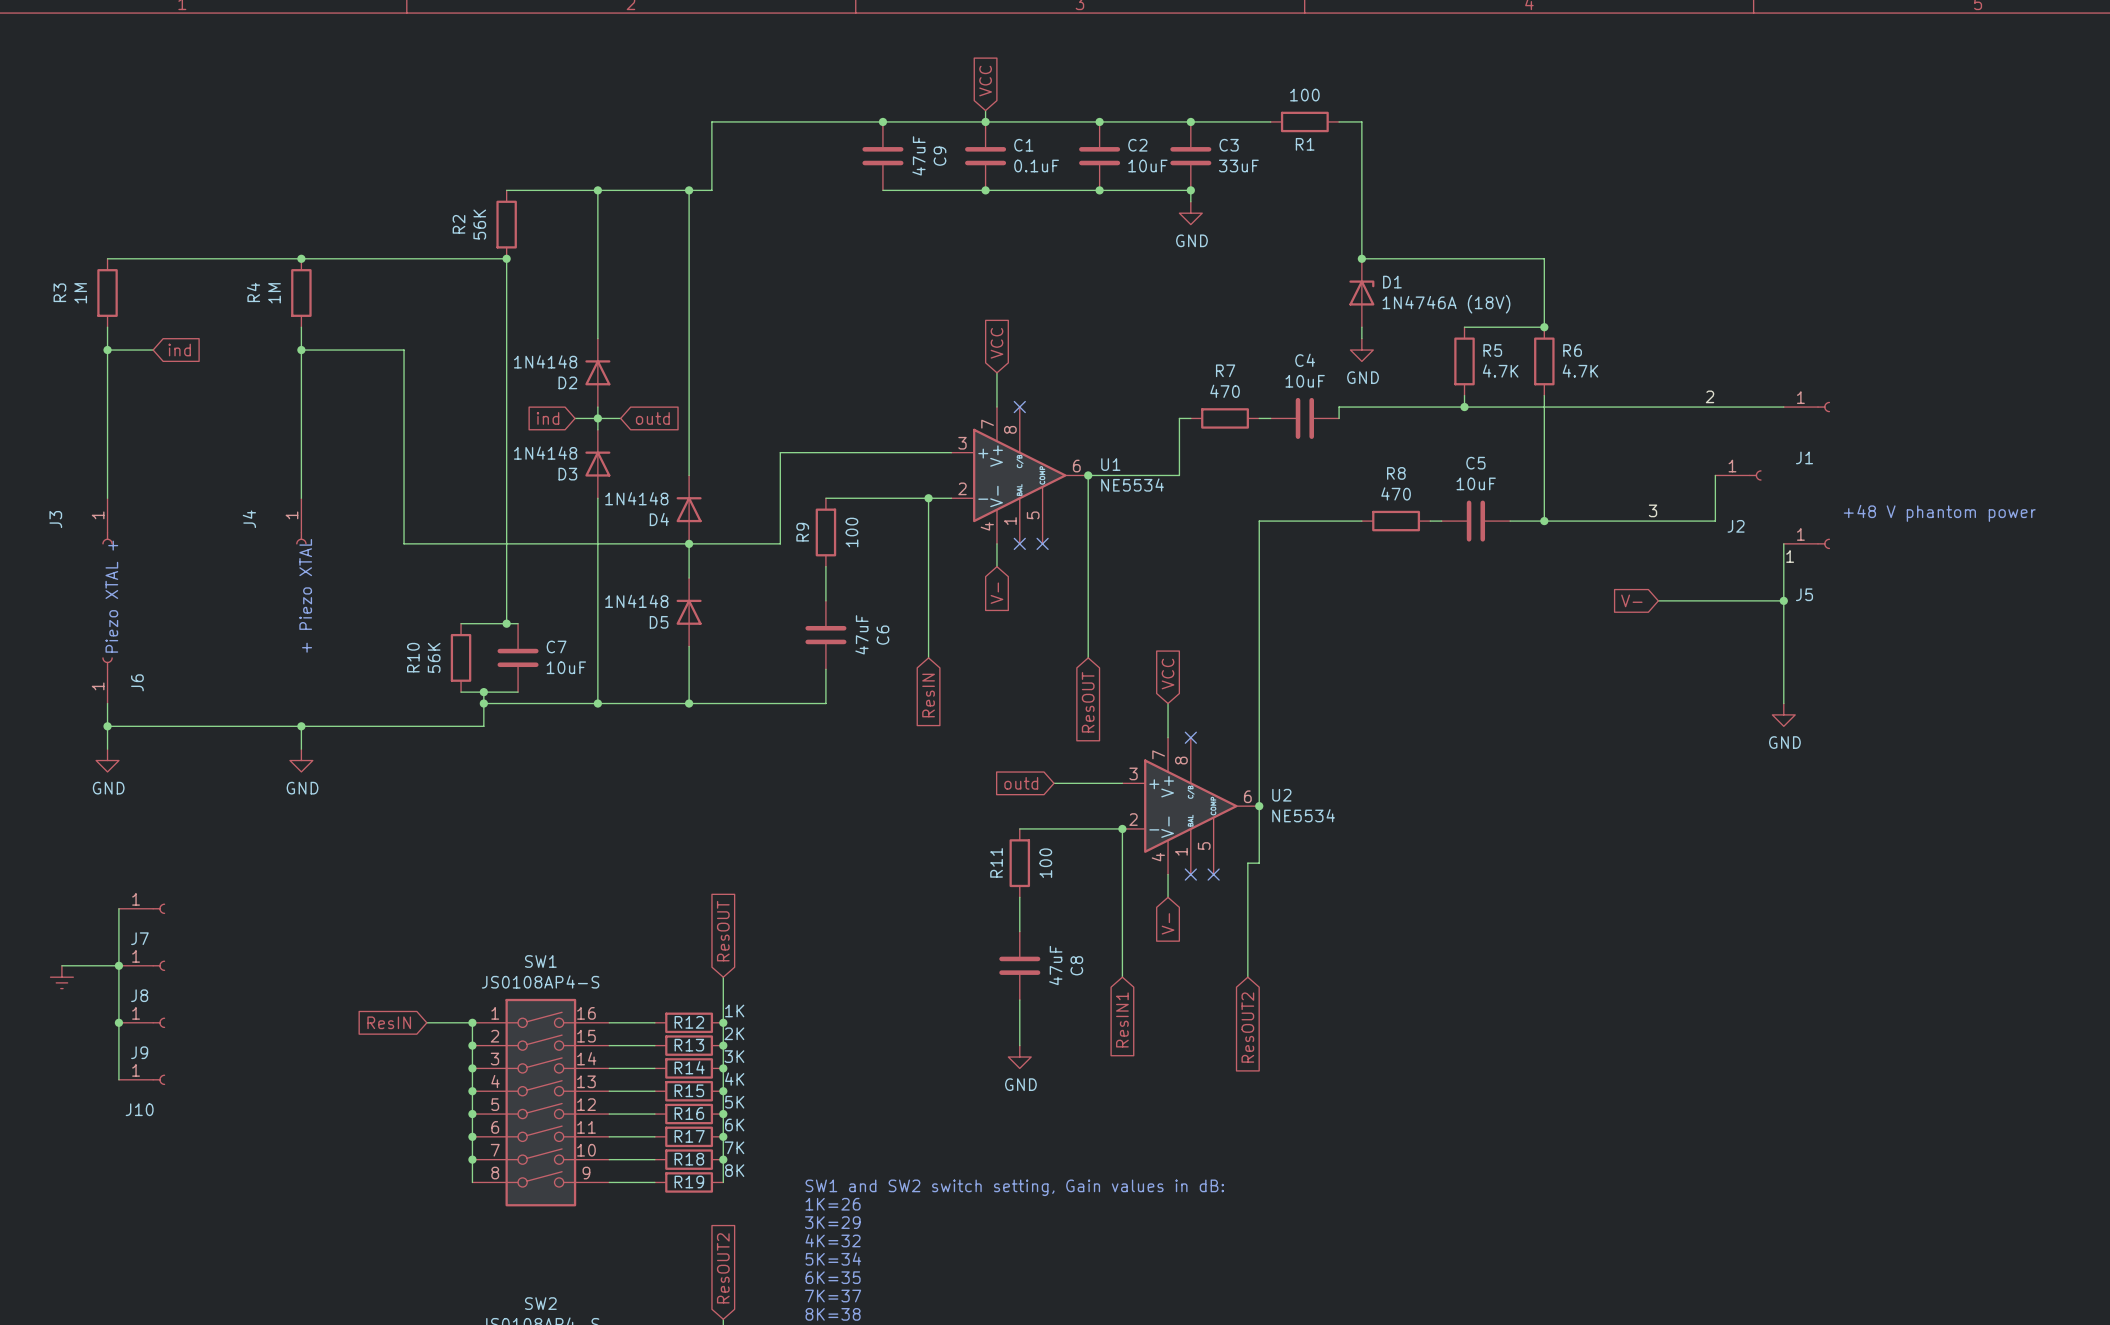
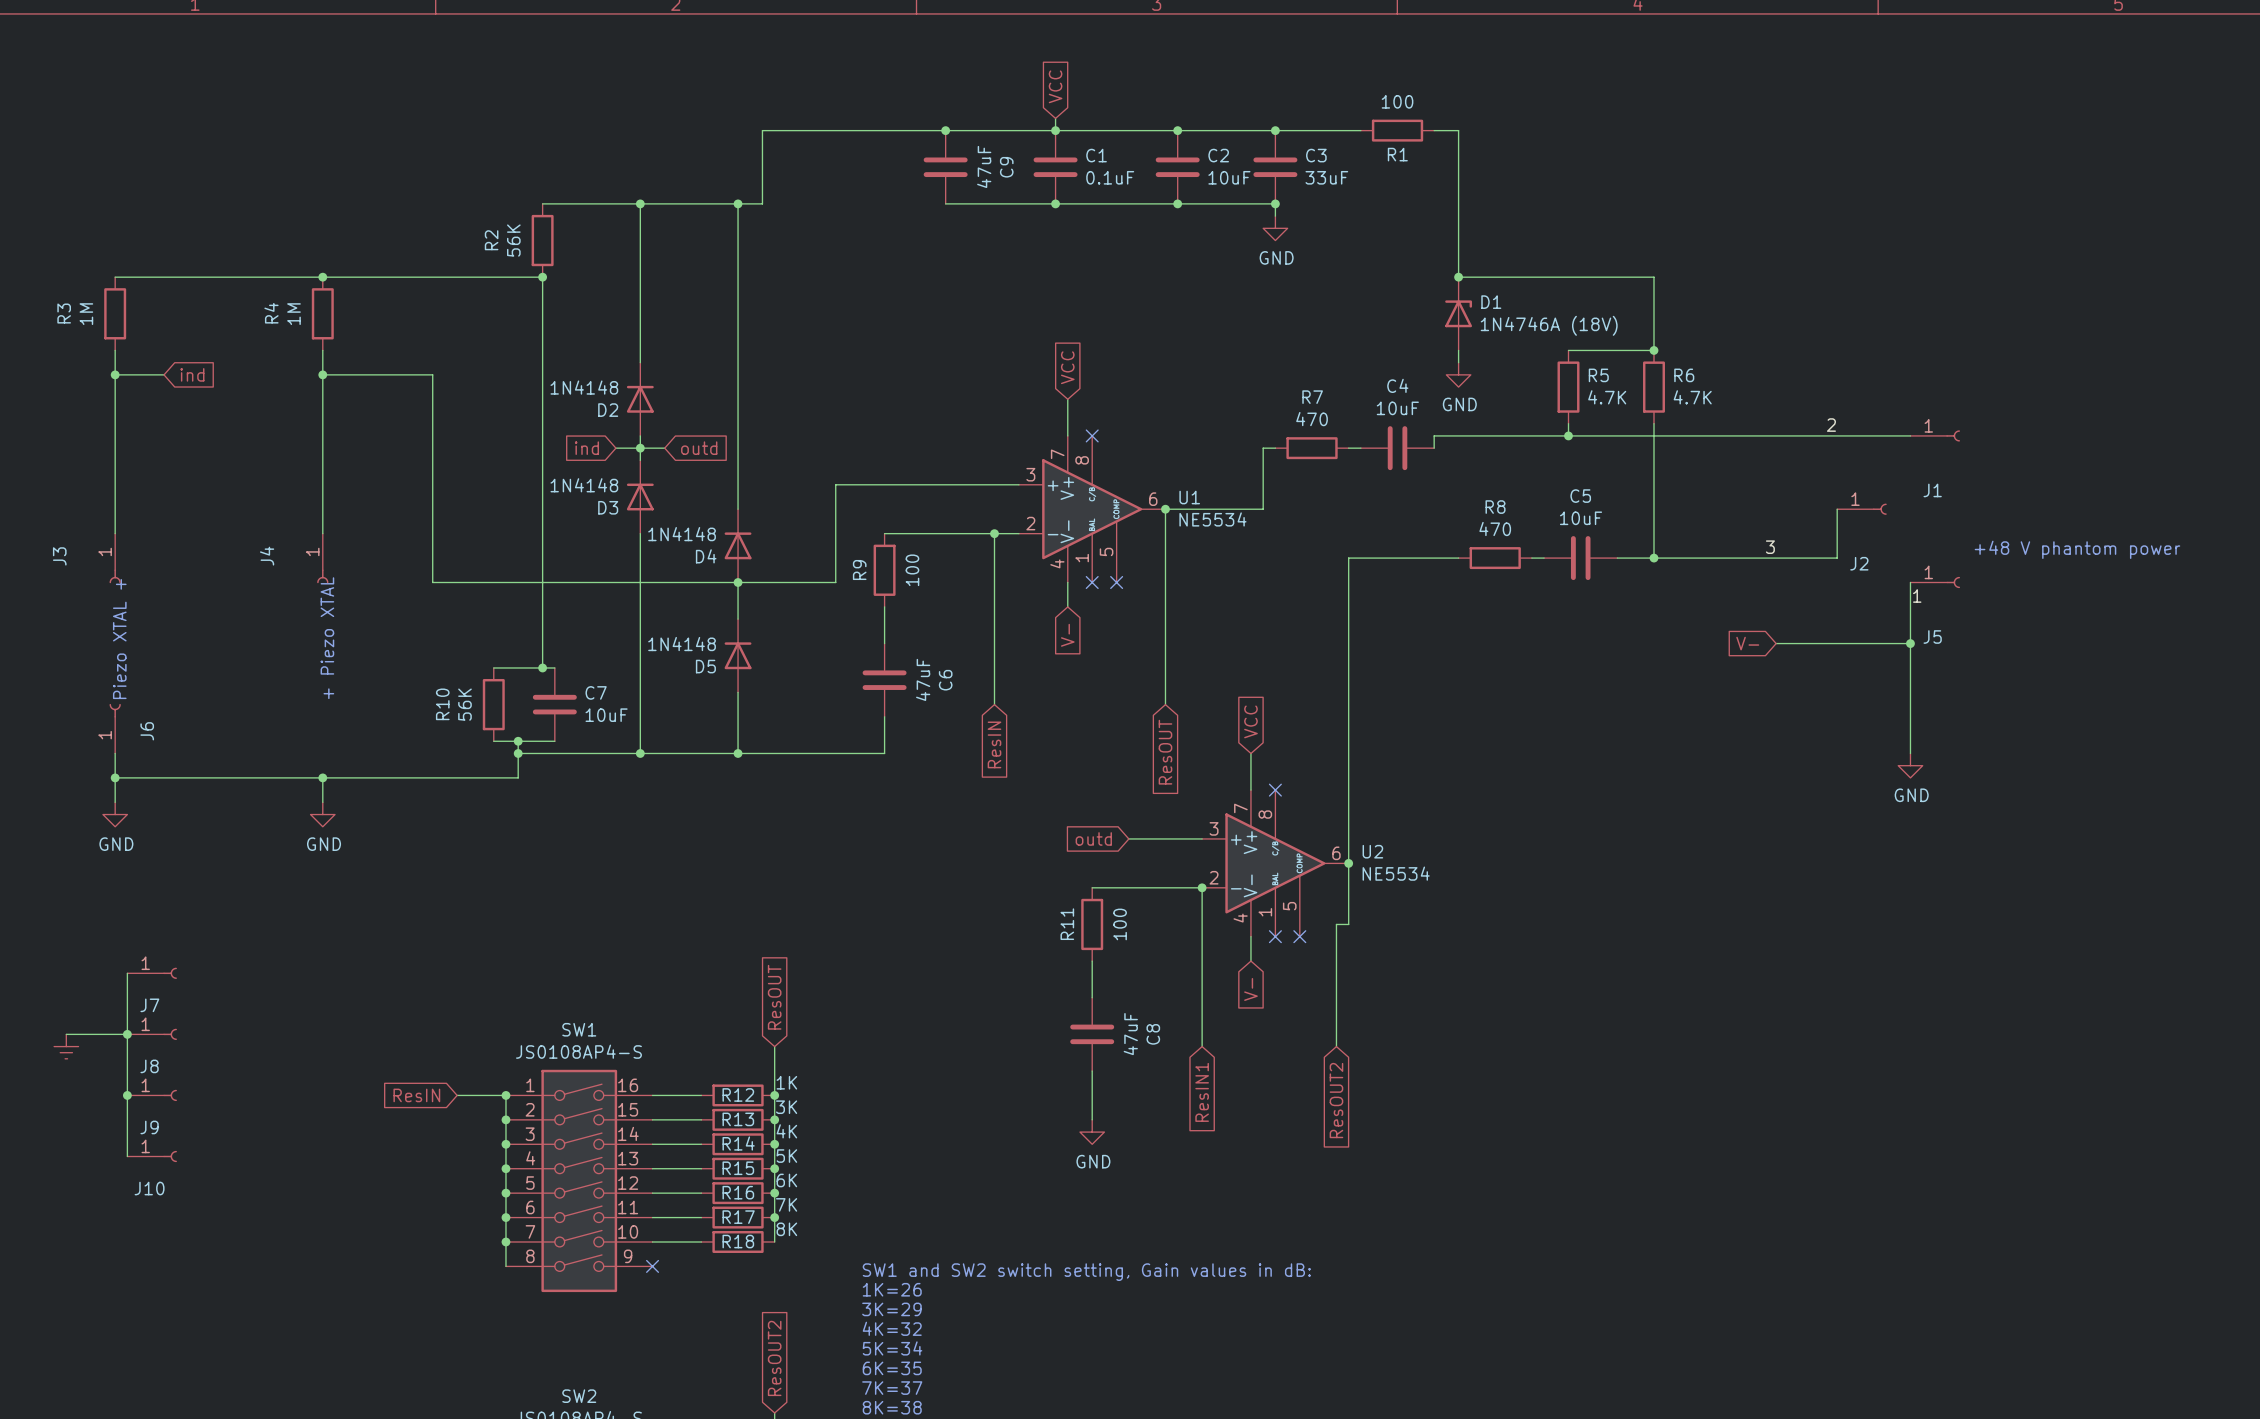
R13 value: 2K (734, 1033) -> 3K (786, 1107)
R14 value: 3K (734, 1056) -> 4K (786, 1131)
R15 value: 4K (734, 1079) -> 5K (786, 1156)
R16 value: 5K (734, 1102) -> 6K (786, 1180)
R17 value: 6K (734, 1125) -> 7K (786, 1204)
R18 value: 7K (734, 1147) -> 8K (786, 1229)
wire: (723, 1159) (723, 1182) -> none
junction: (723, 1159) -> none
wire: (609, 1182) (654, 1182) -> none
no-connect mark: none -> (652, 1266)
R19: 8K (689, 1182) -> none

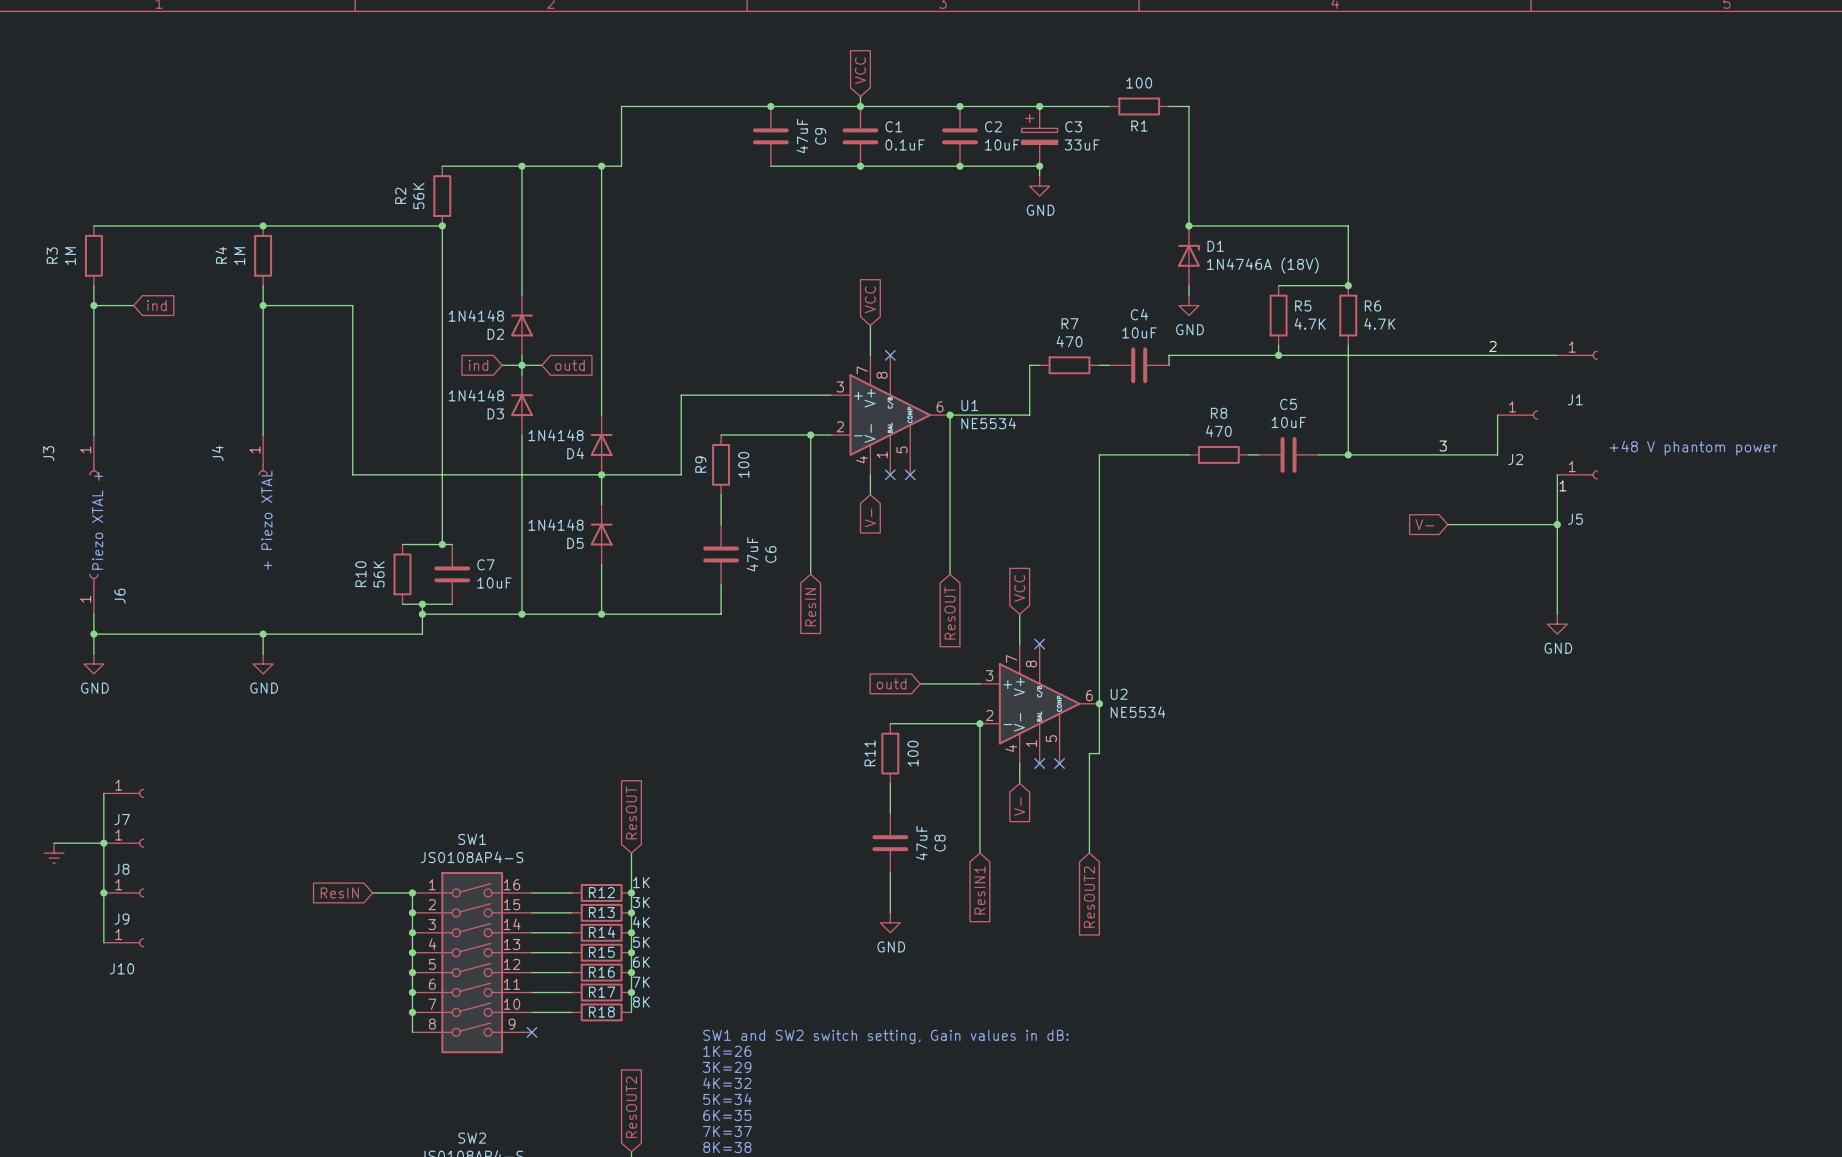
C3 symbol: [1253, 130, 1298, 204] -> [1021, 106, 1058, 167]

